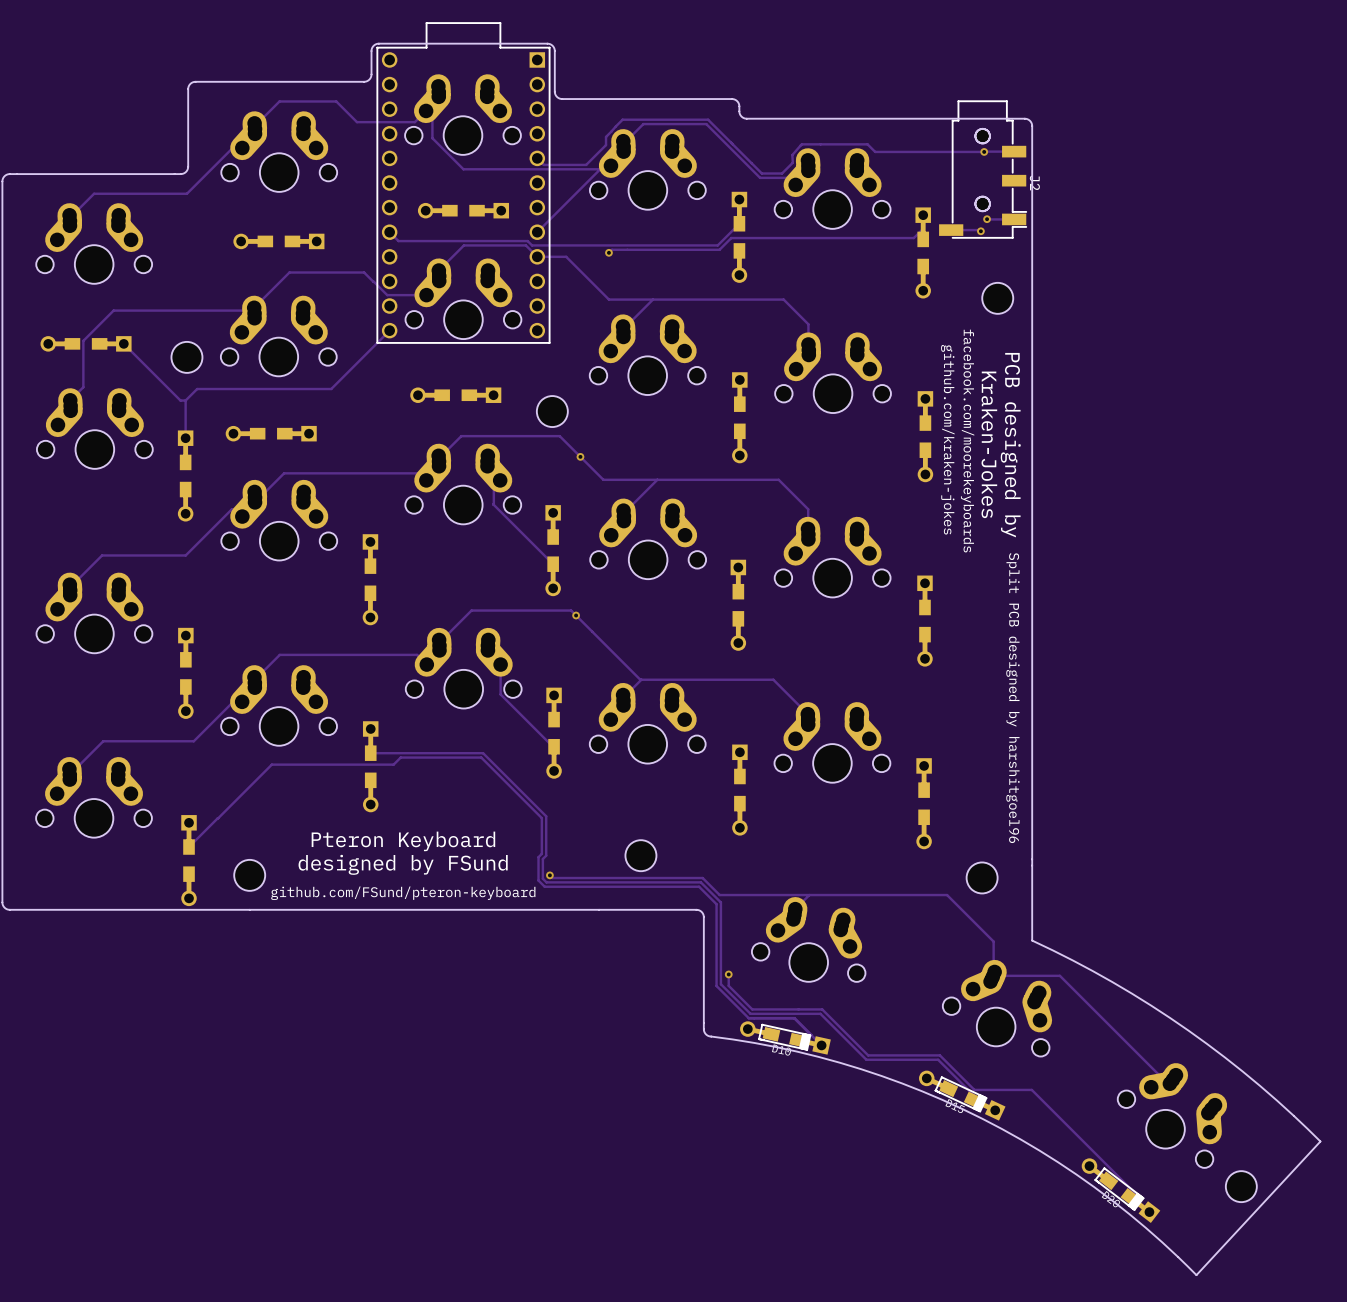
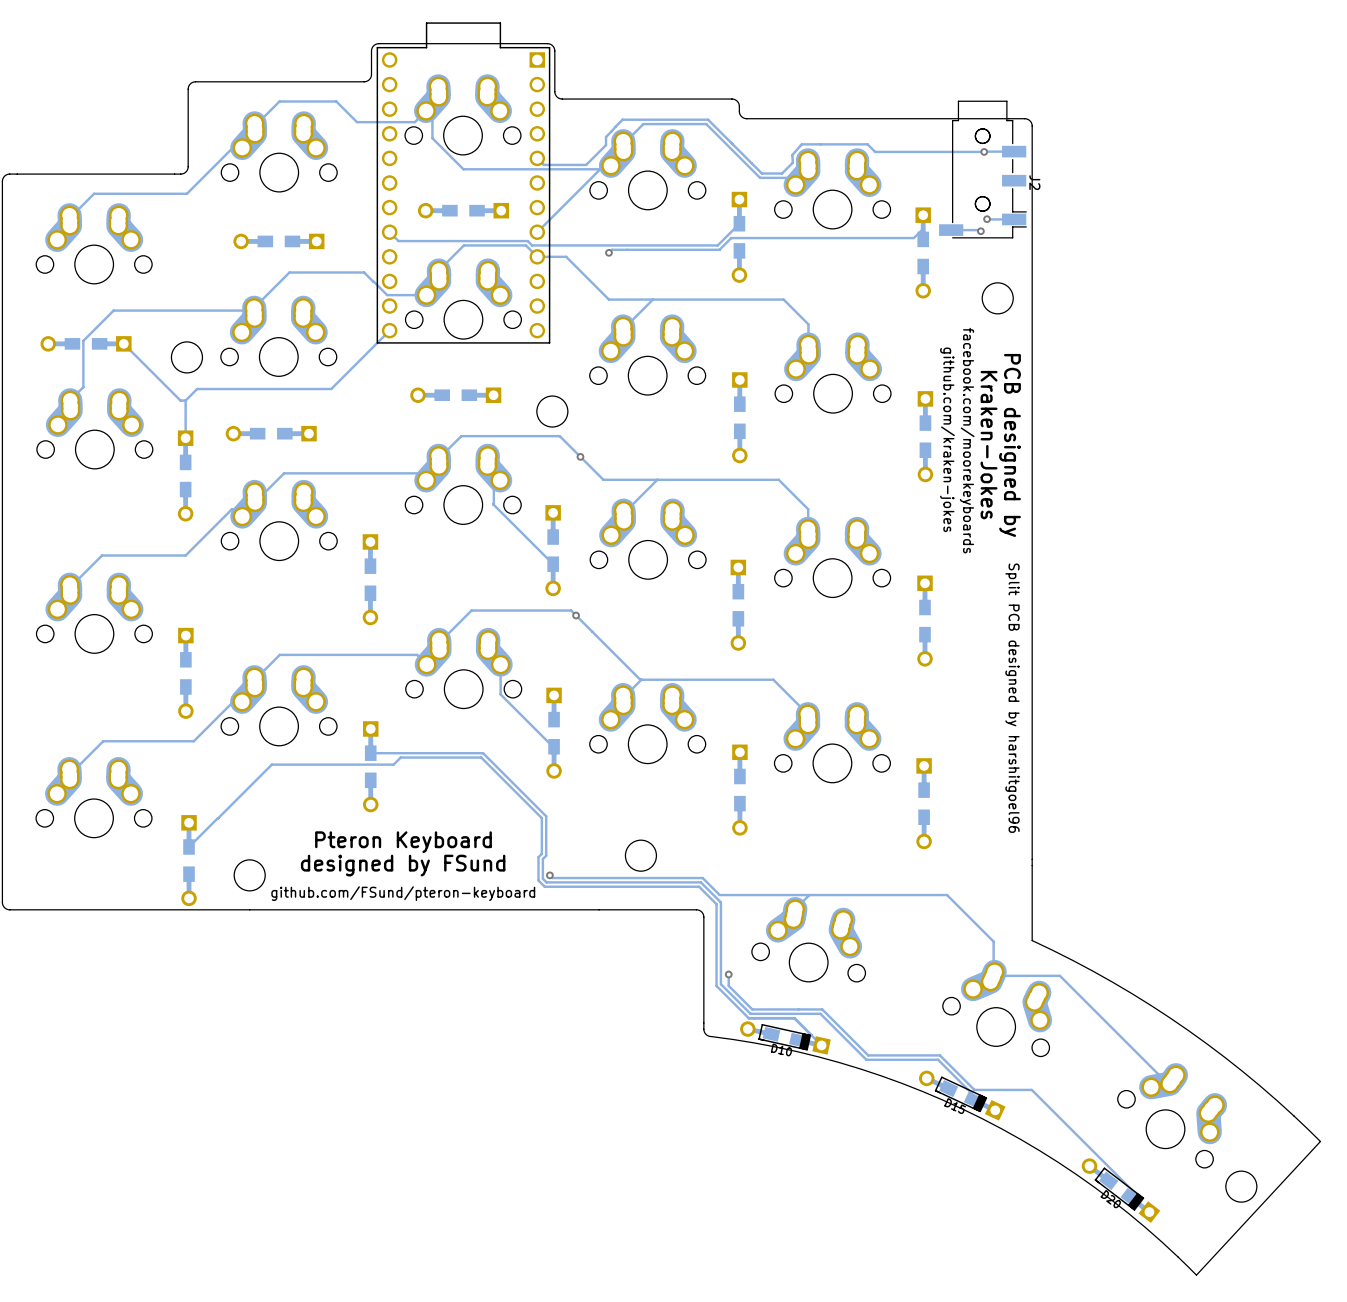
part: (982, 877) -> none

